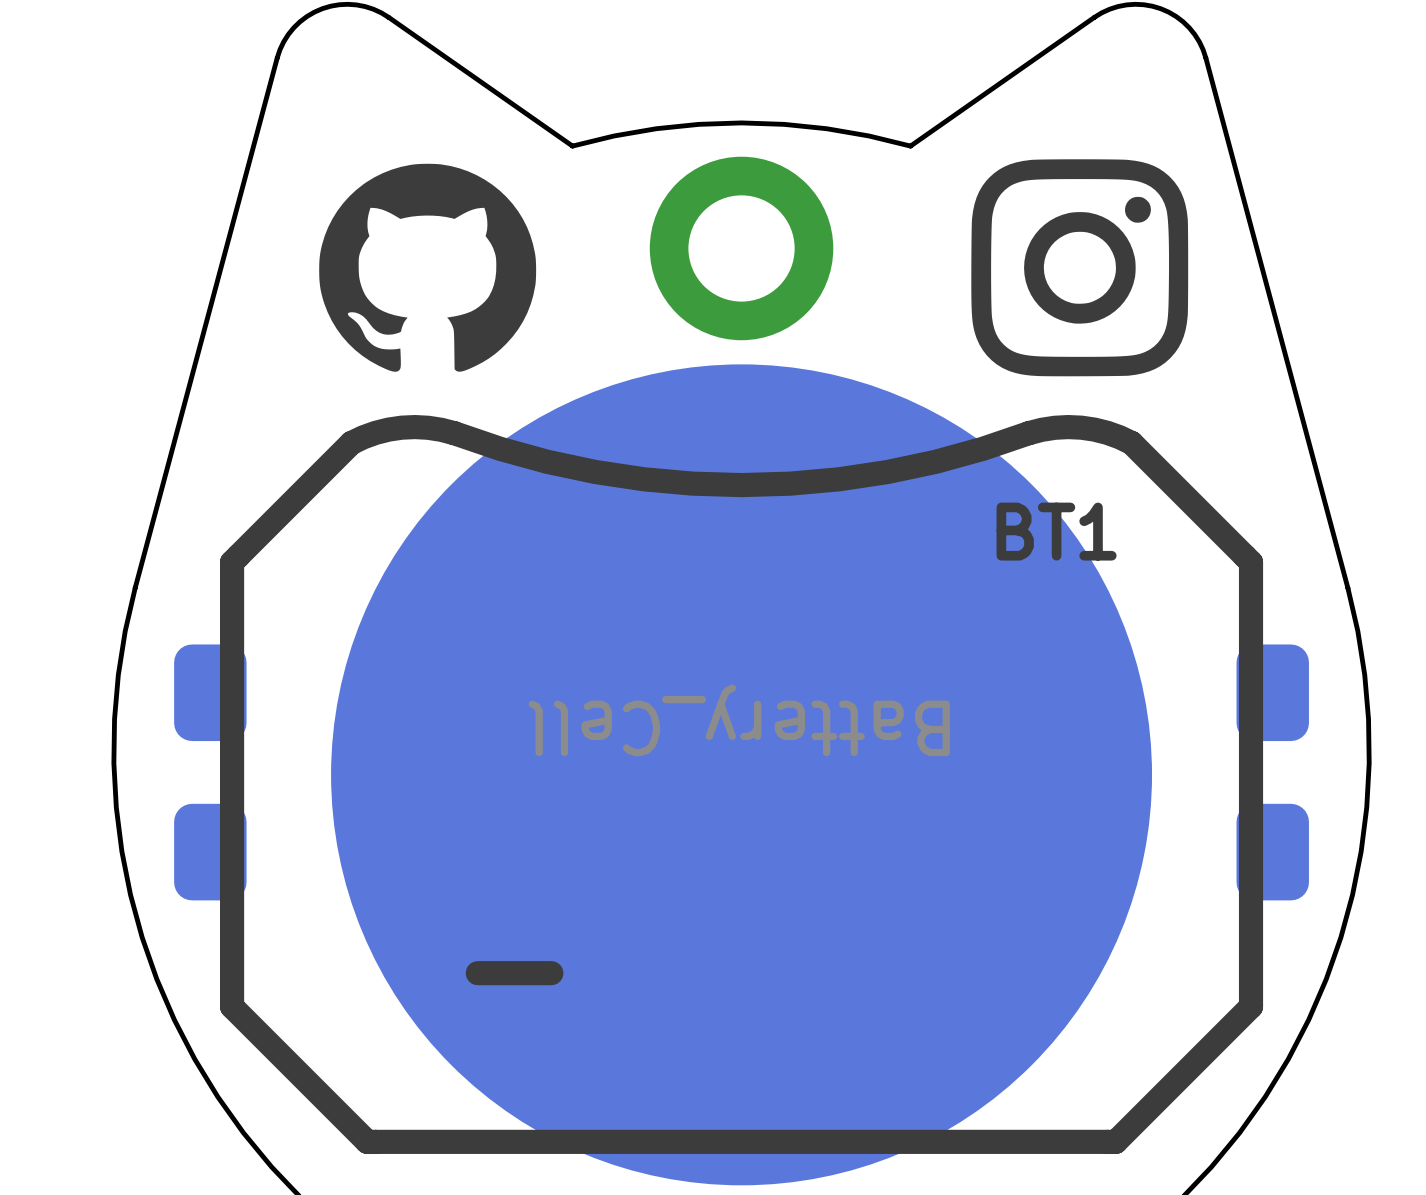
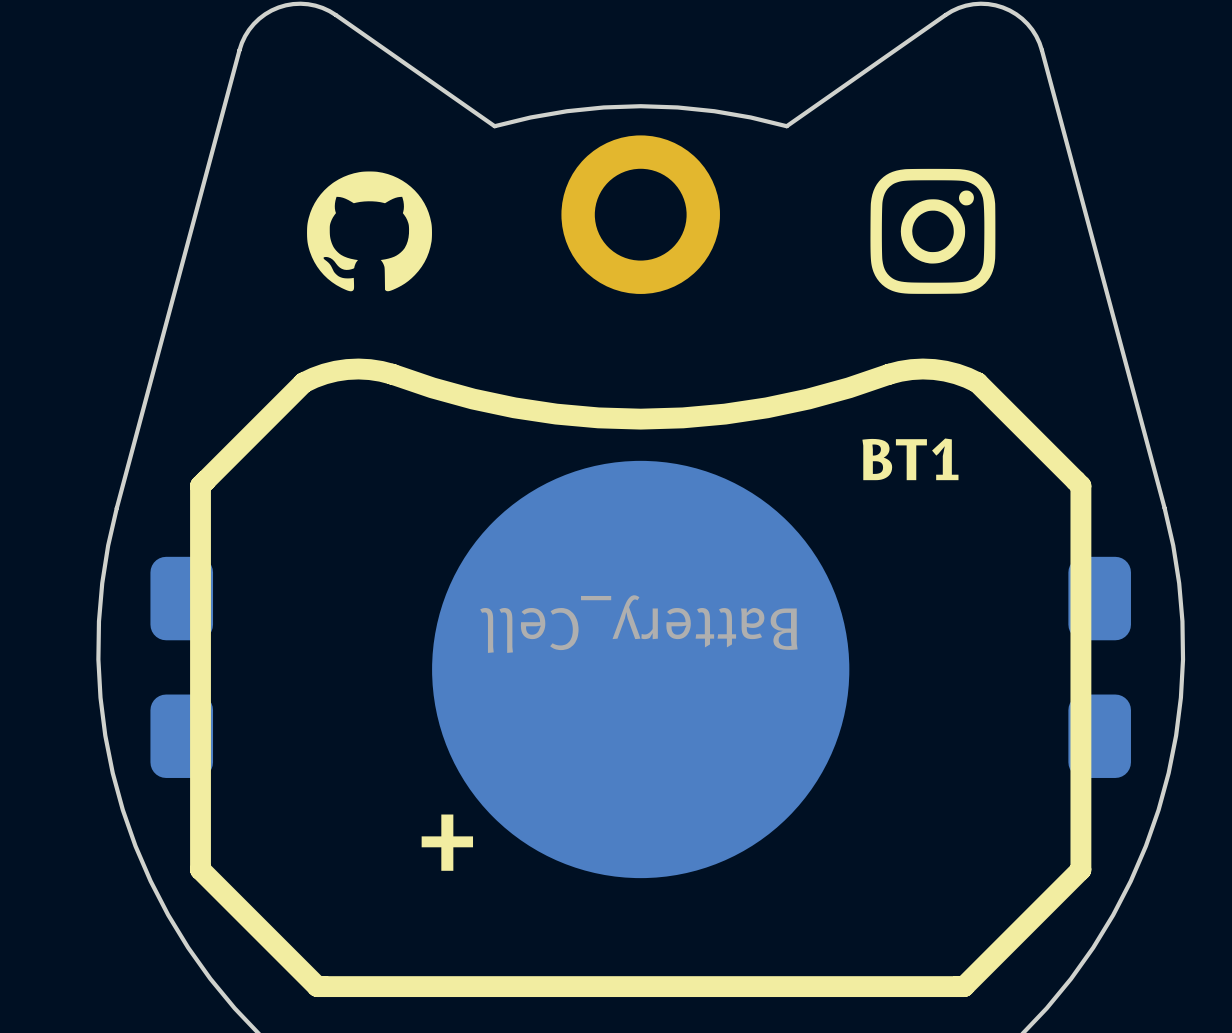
drawing shape: [971, 159, 1189, 377] -> [870, 168, 996, 294]
drawing shape: [319, 163, 537, 372] -> [307, 171, 432, 292]
BT1 footprint: [174, 364, 1309, 1186] -> [150, 358, 1131, 998]

